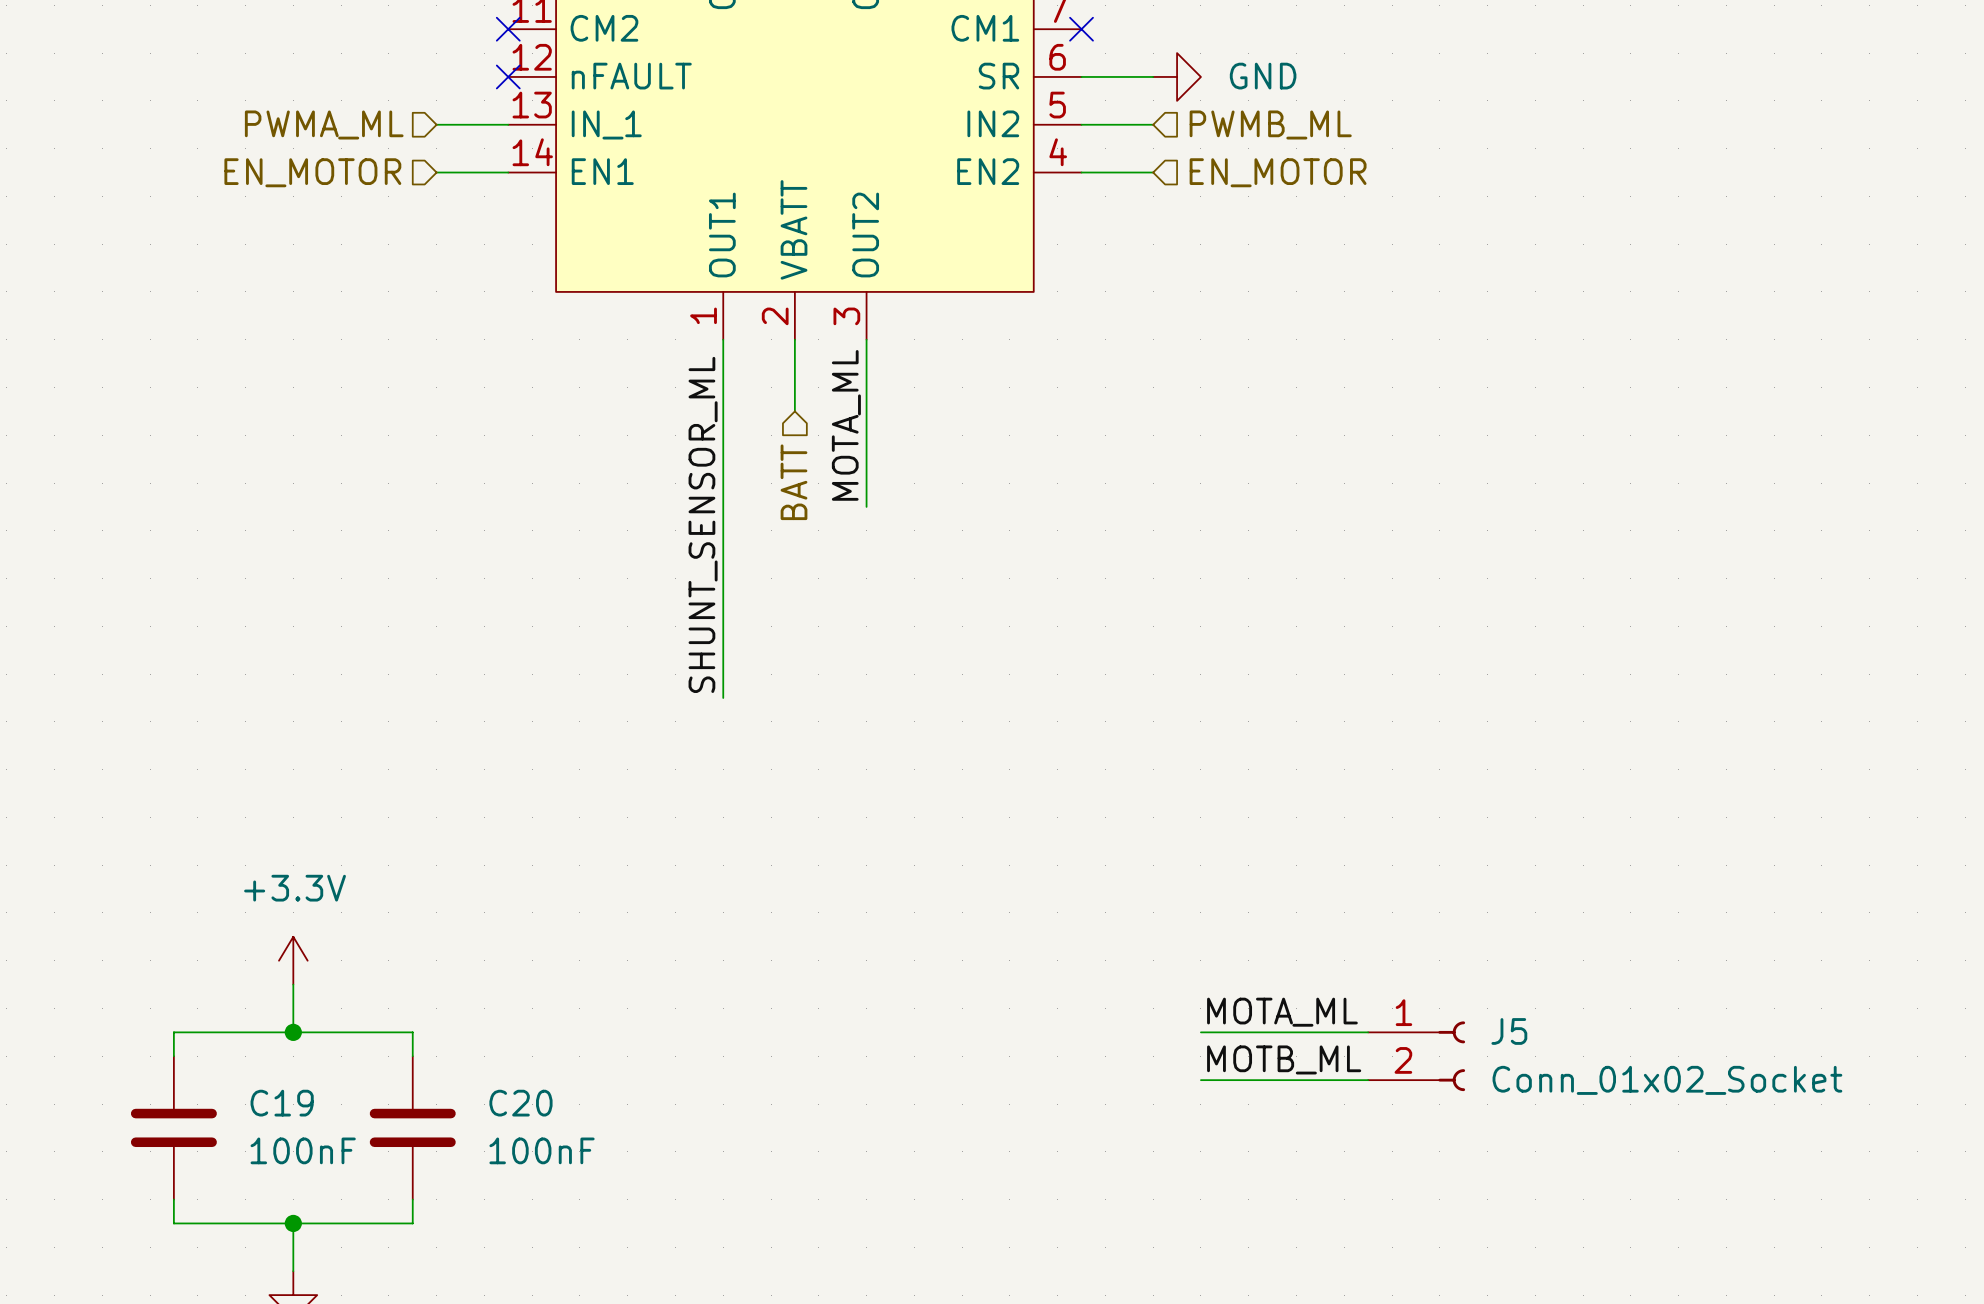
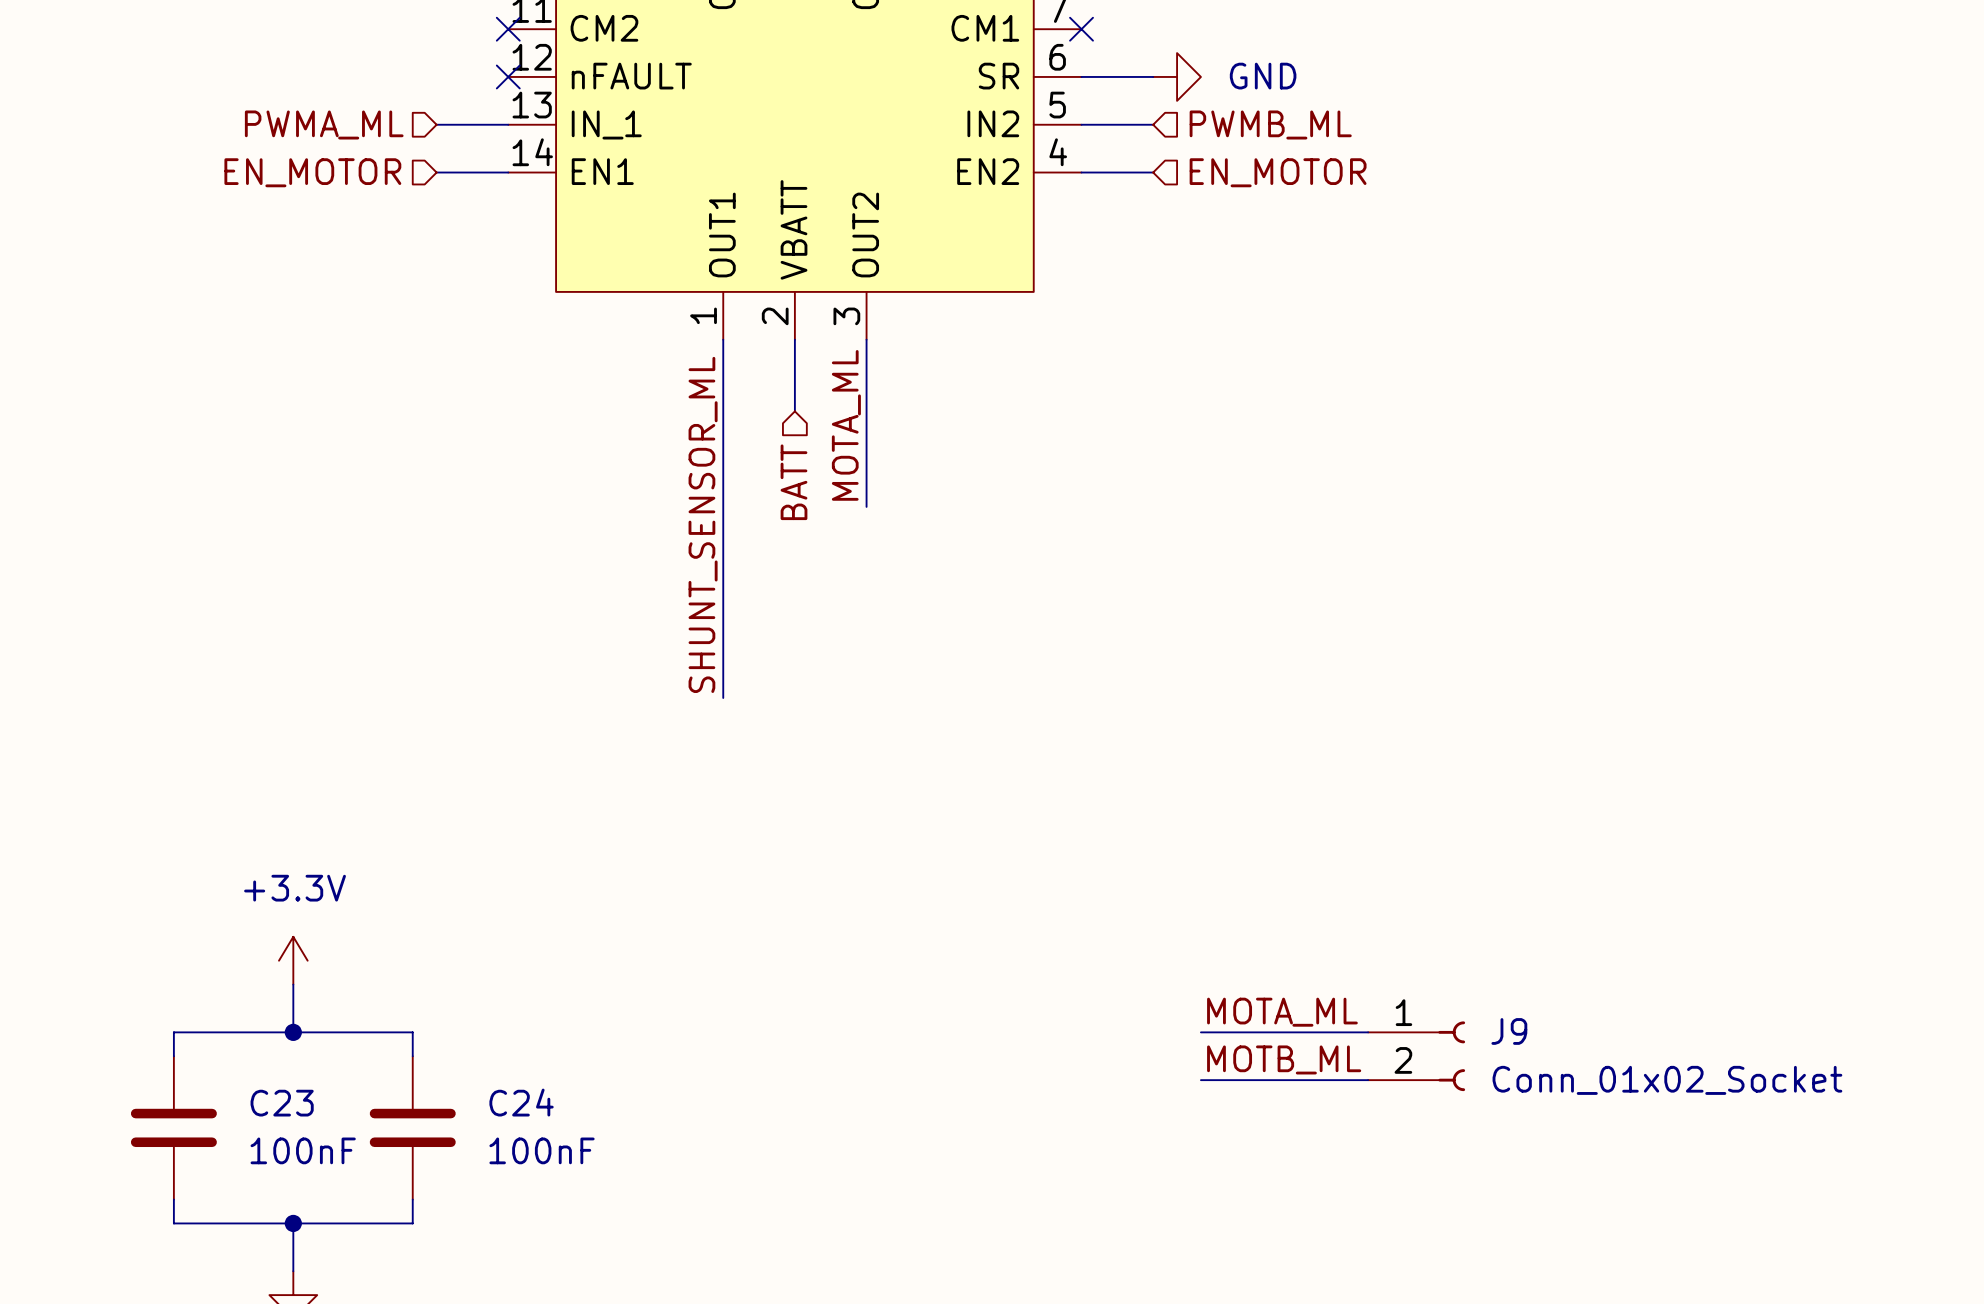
J5 name: J5 (1509, 1031) -> J9 (1509, 1031)
C19 name: C19 (282, 1103) -> C23 (282, 1103)
C20 name: C20 (520, 1103) -> C24 (521, 1102)

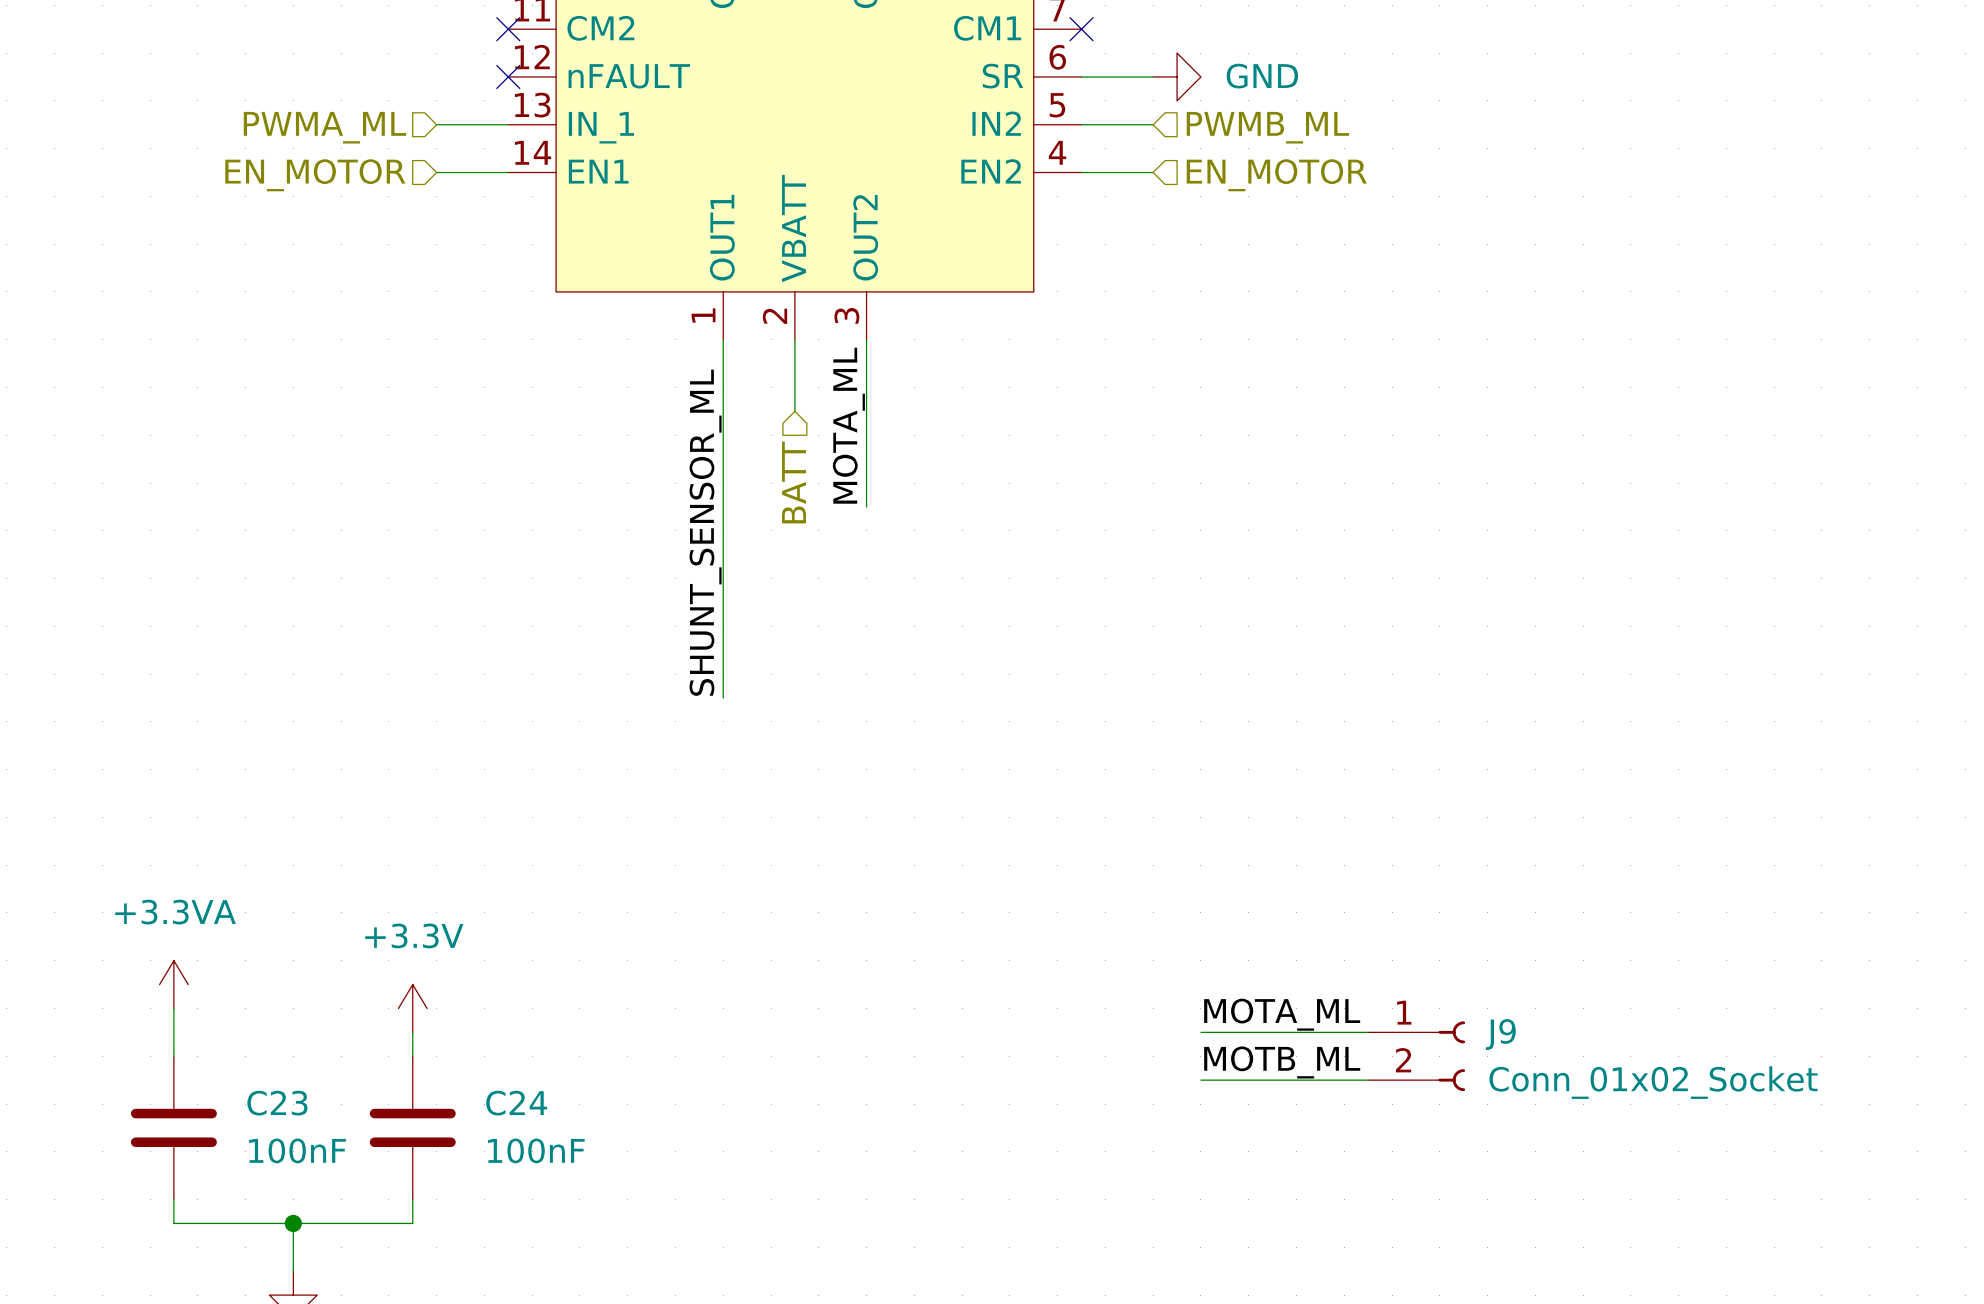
power symbol position: +3.3V (293, 960) -> +3.3V (412, 1008)
power symbol: none -> +3.3VA (173, 984)
wire: (293, 984) (293, 1032) -> none
wire: (173, 1032) (412, 1032) -> (173, 1032) (173, 1008)
junction: (293, 1032) -> none

